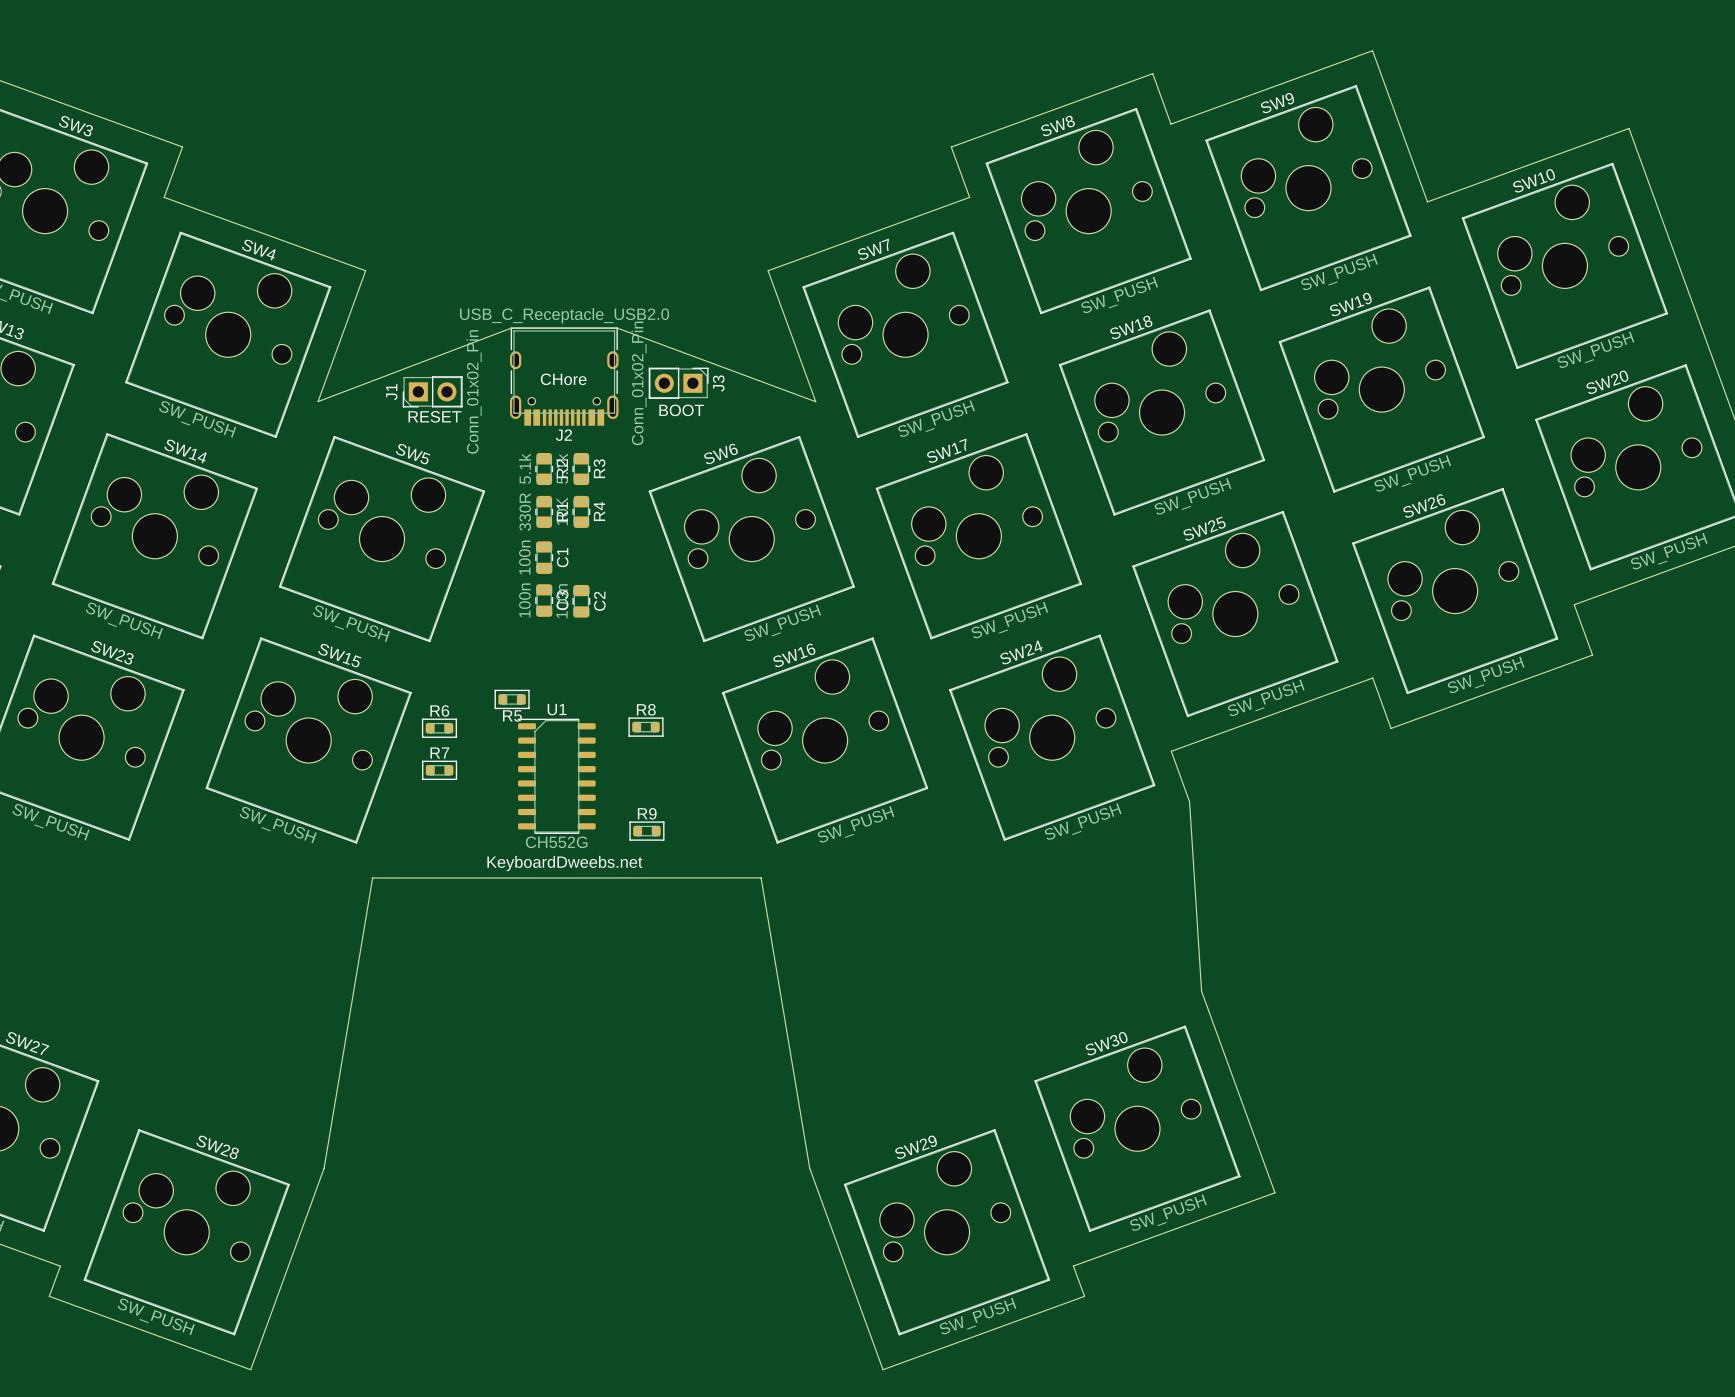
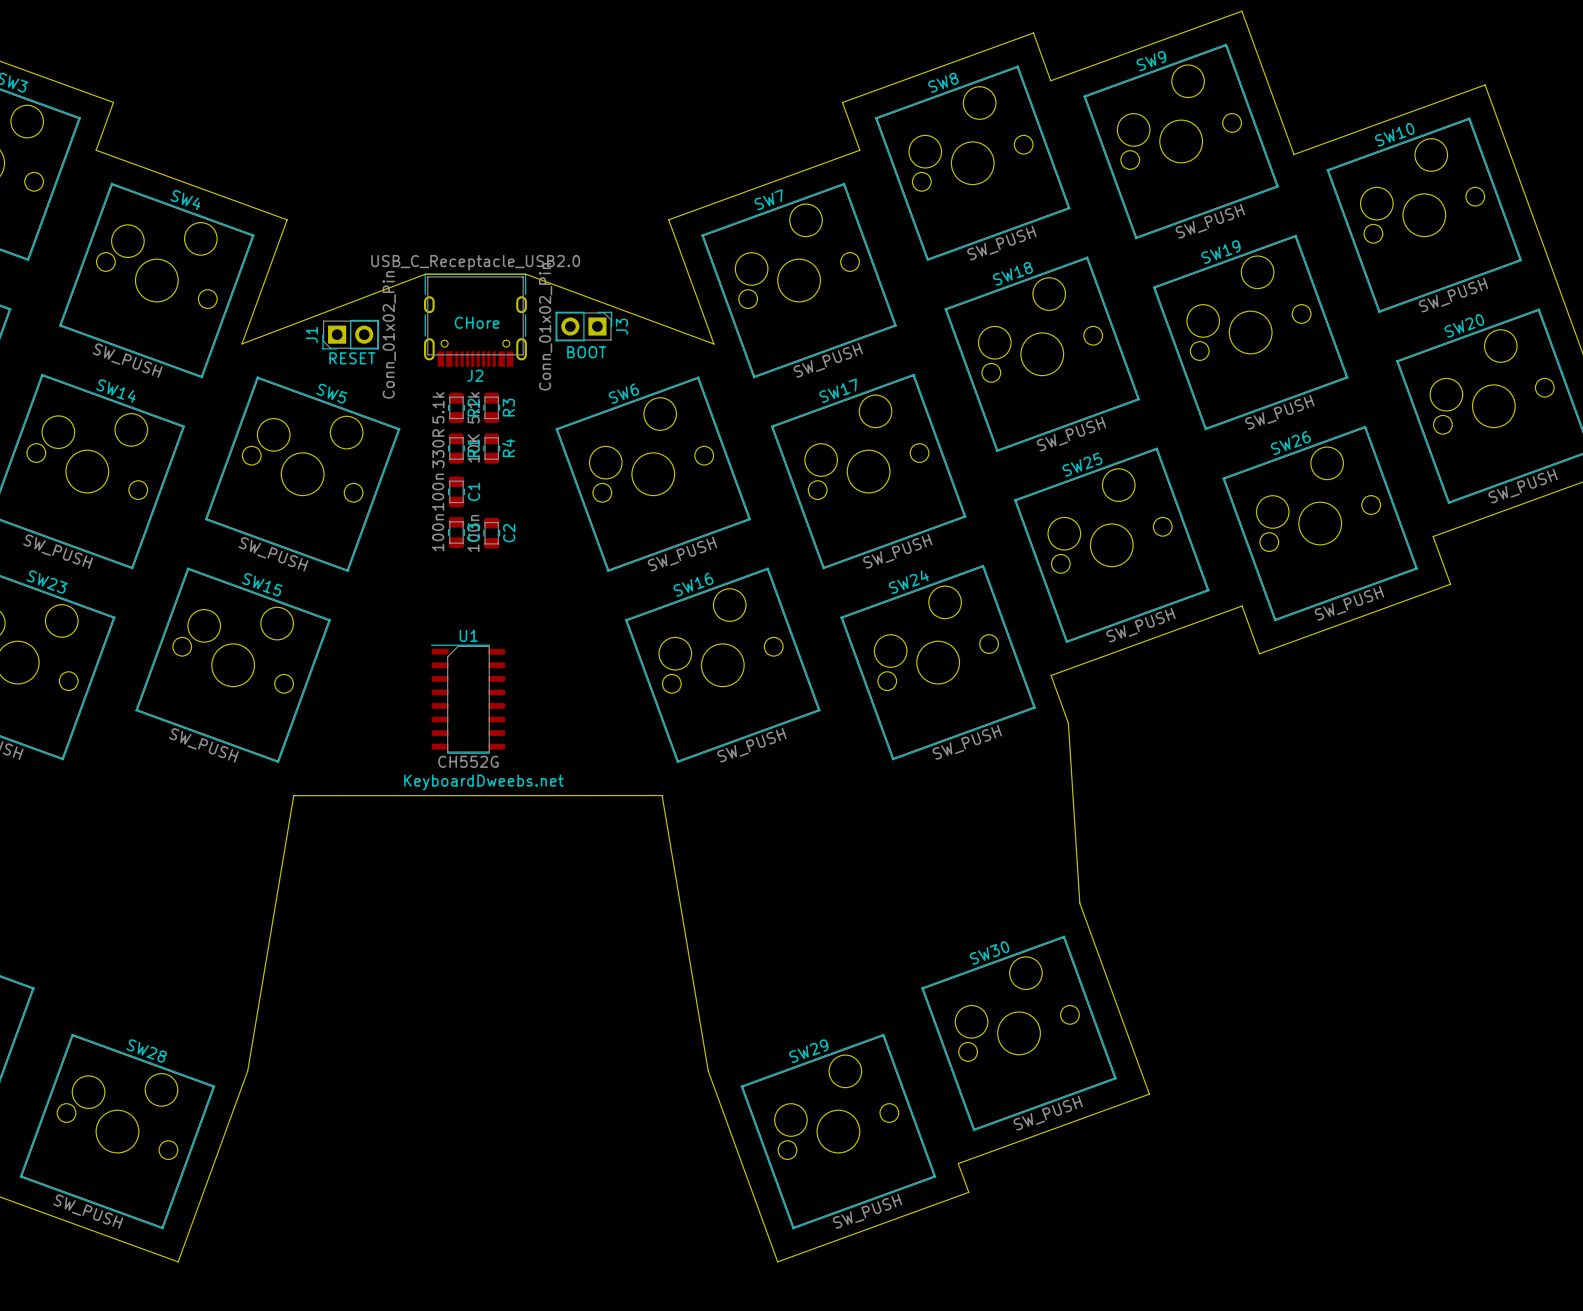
R5: (512, 699) -> none
R8: (645, 727) -> none
R6: (439, 728) -> none
R7: (439, 770) -> none
R9: (646, 831) -> none

